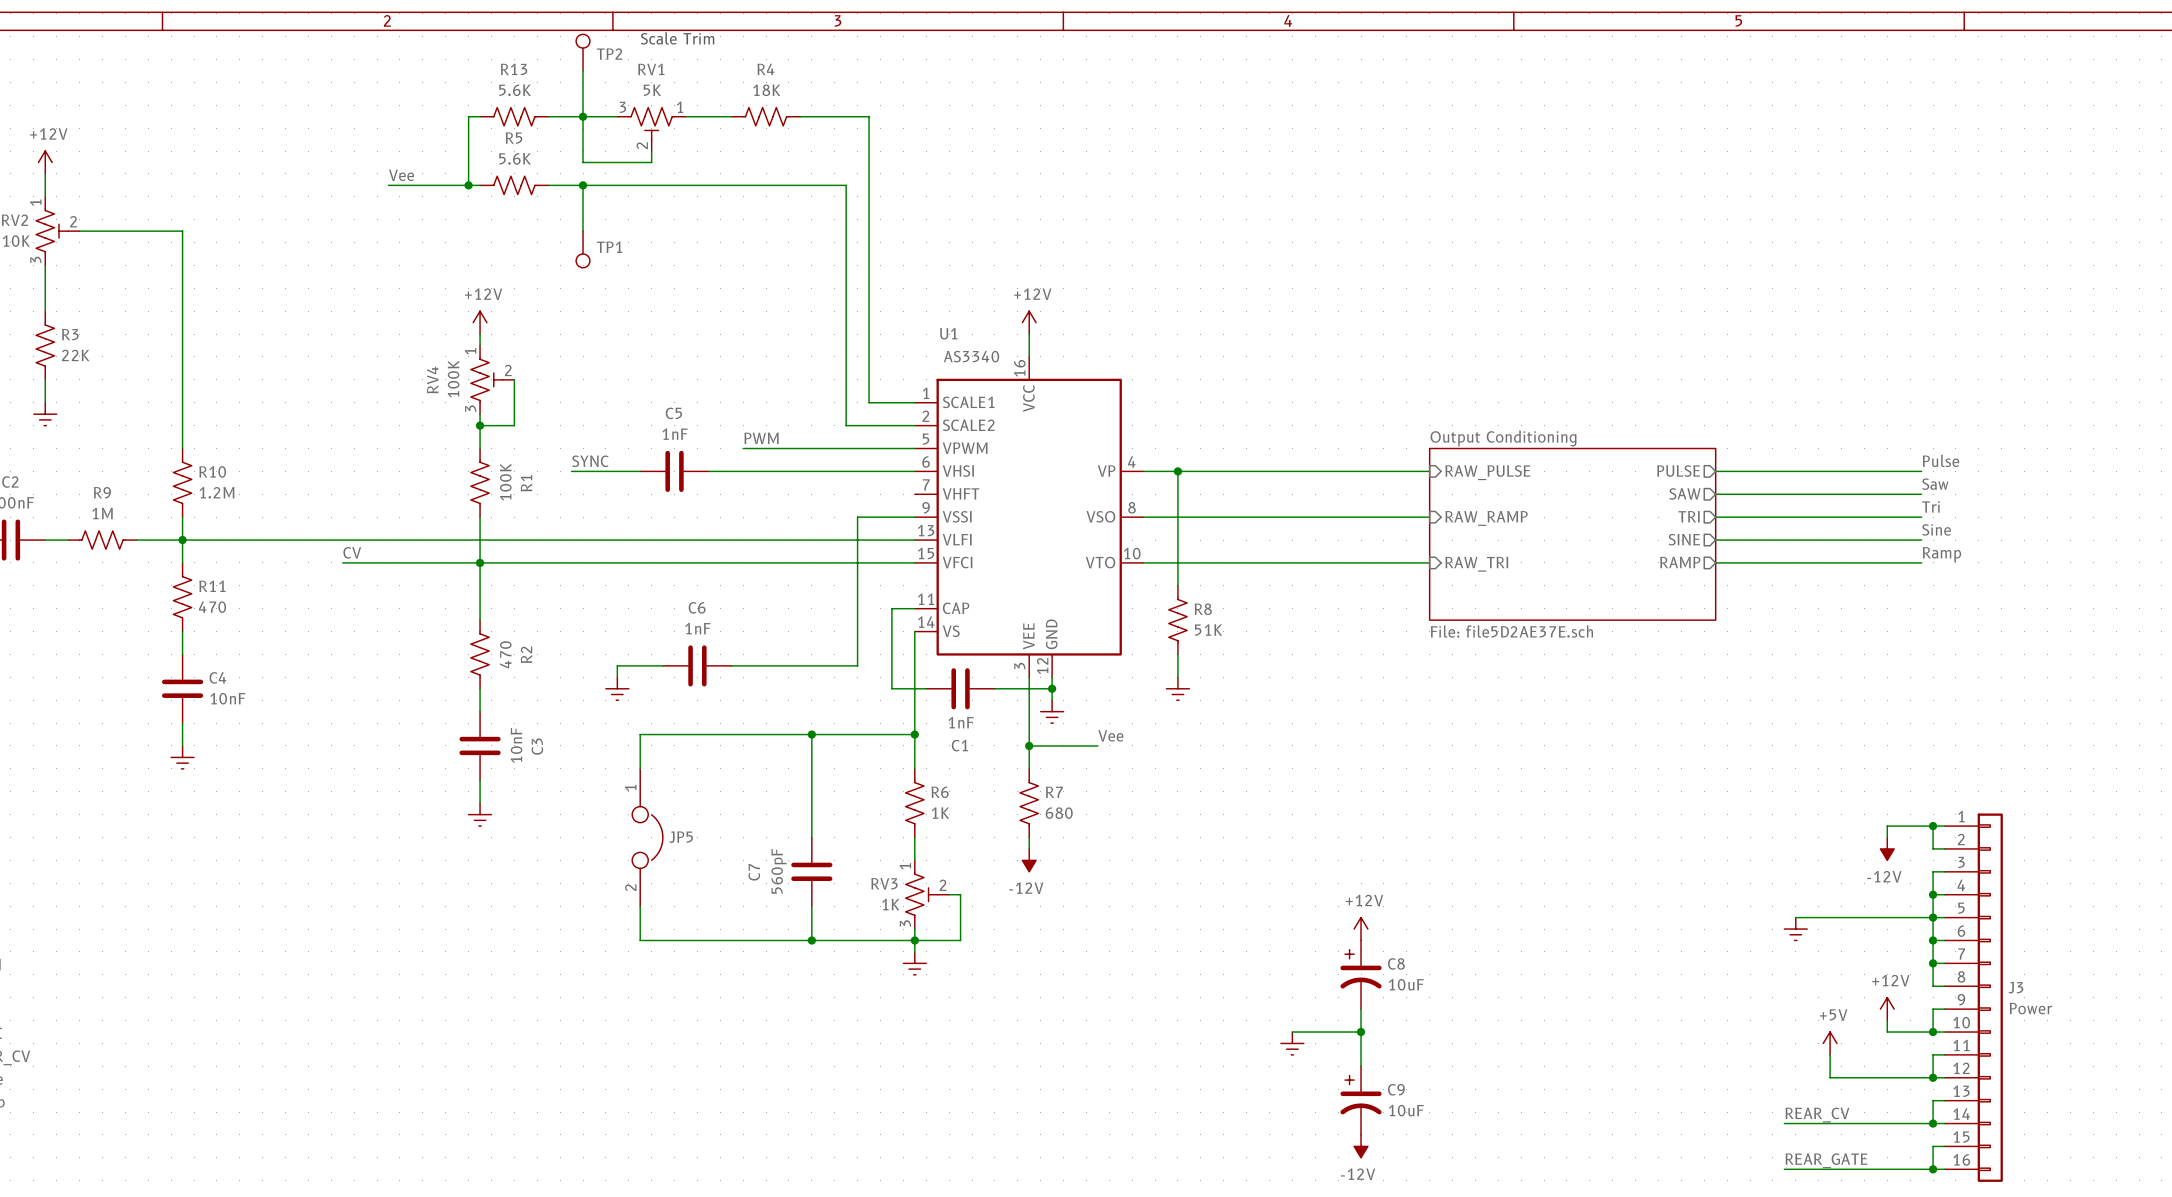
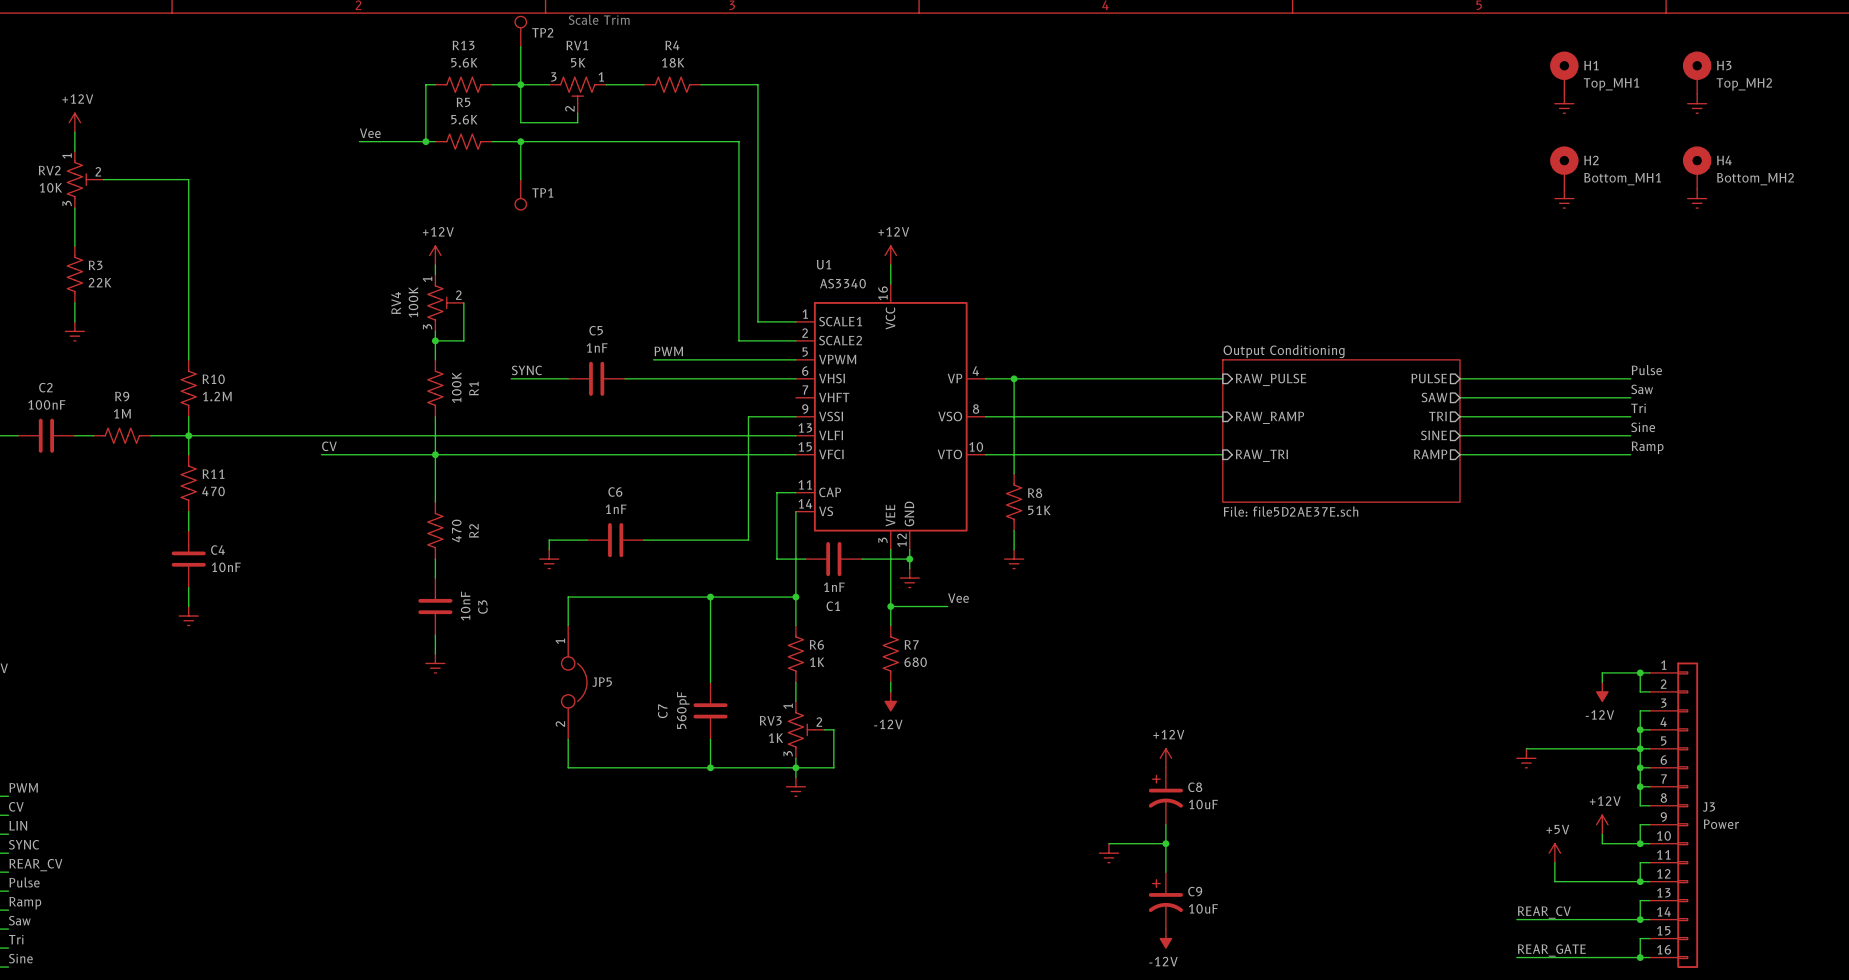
H1: none -> Top_MH1 (1564, 72)
H3: none -> Top_MH2 (1697, 72)
power symbol: none -> (1564, 103)
power symbol: none -> (1697, 103)
H2: none -> Bottom_MH1 (1564, 167)
H4: none -> Bottom_MH2 (1697, 167)
power symbol: none -> (1564, 198)
power symbol: none -> (1697, 198)

